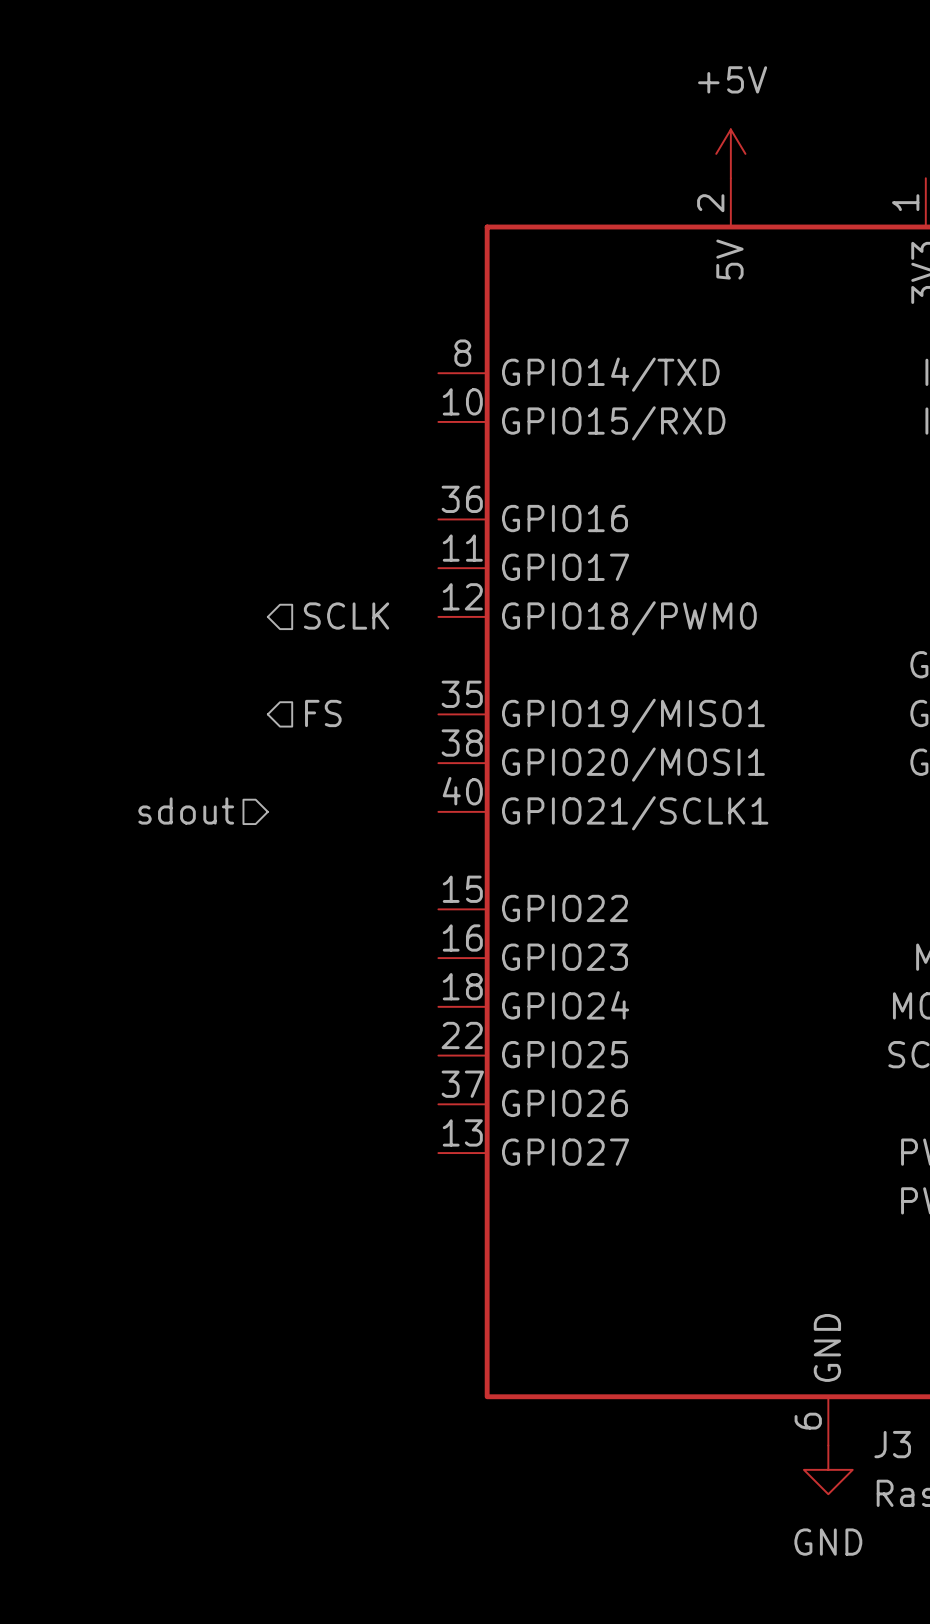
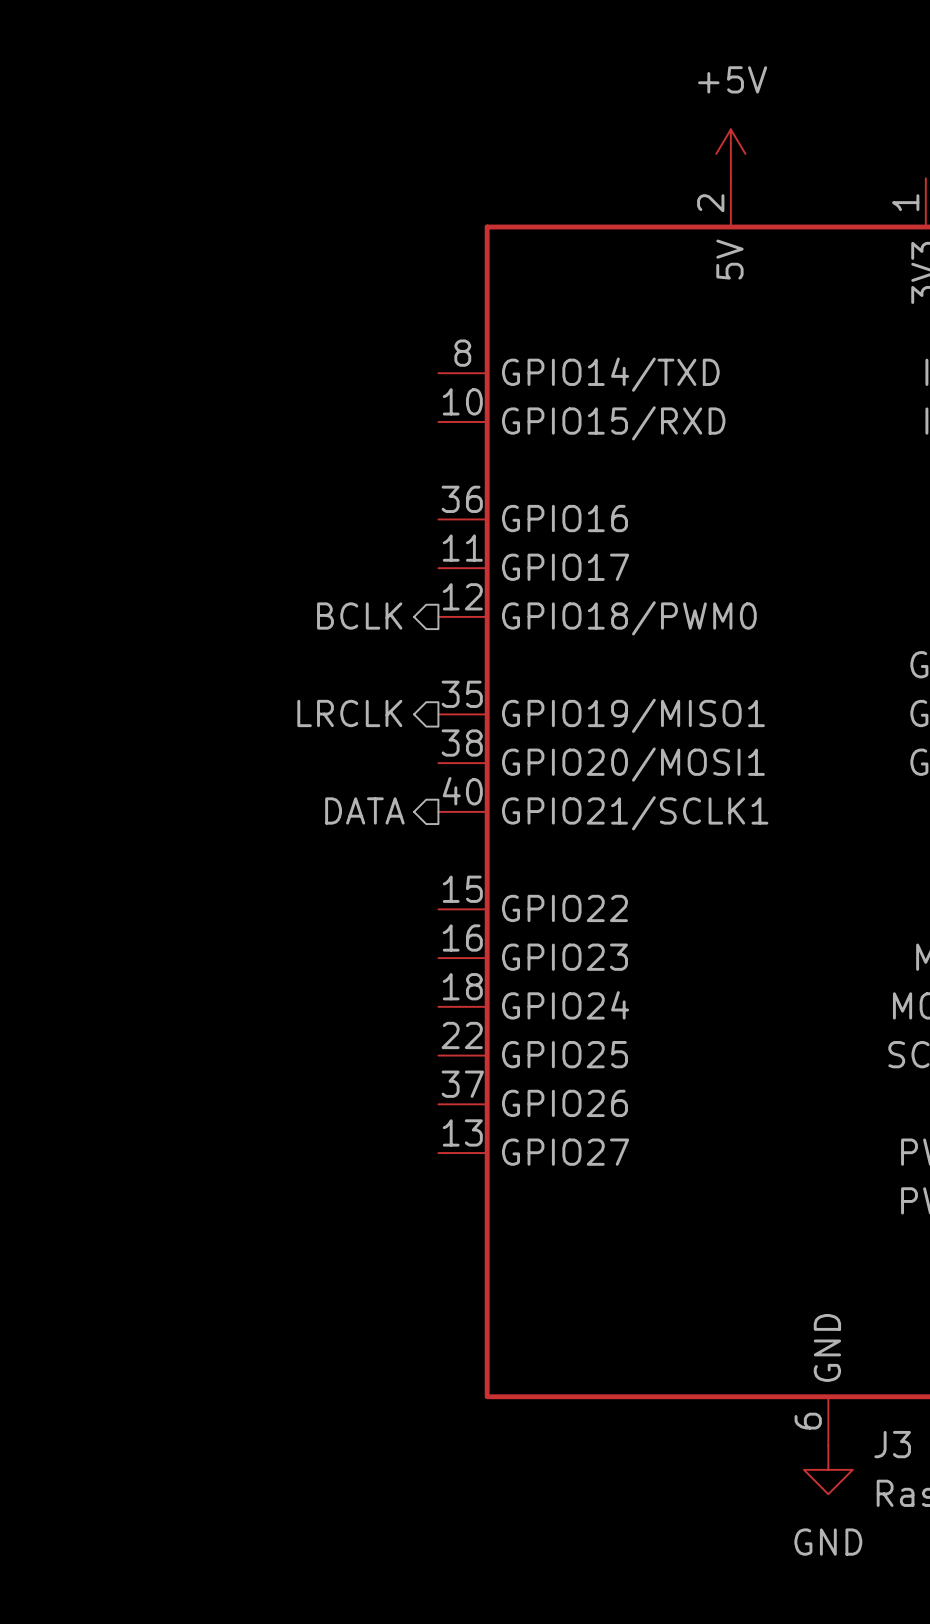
hierarchical label shape: input (346, 616) -> output (359, 616)
hierarchical label: SCLK (346, 616) -> BCLK (359, 616)
hierarchical label: FS (323, 713) -> none
hierarchical label: none -> LRCLK (349, 713)
hierarchical label: sdout (186, 810) -> none
hierarchical label: none -> DATA (364, 810)

